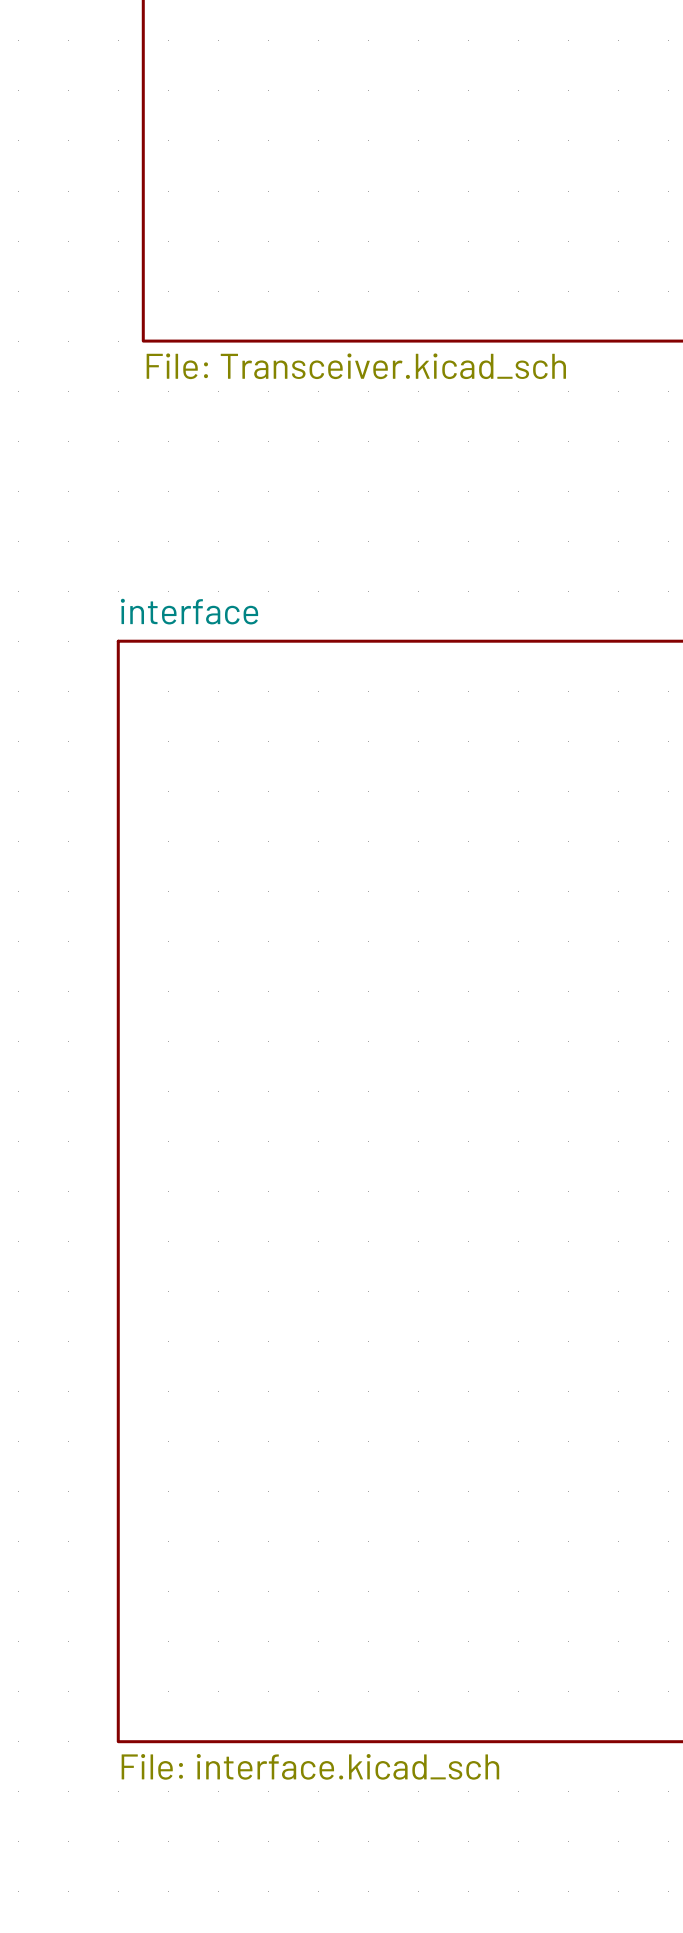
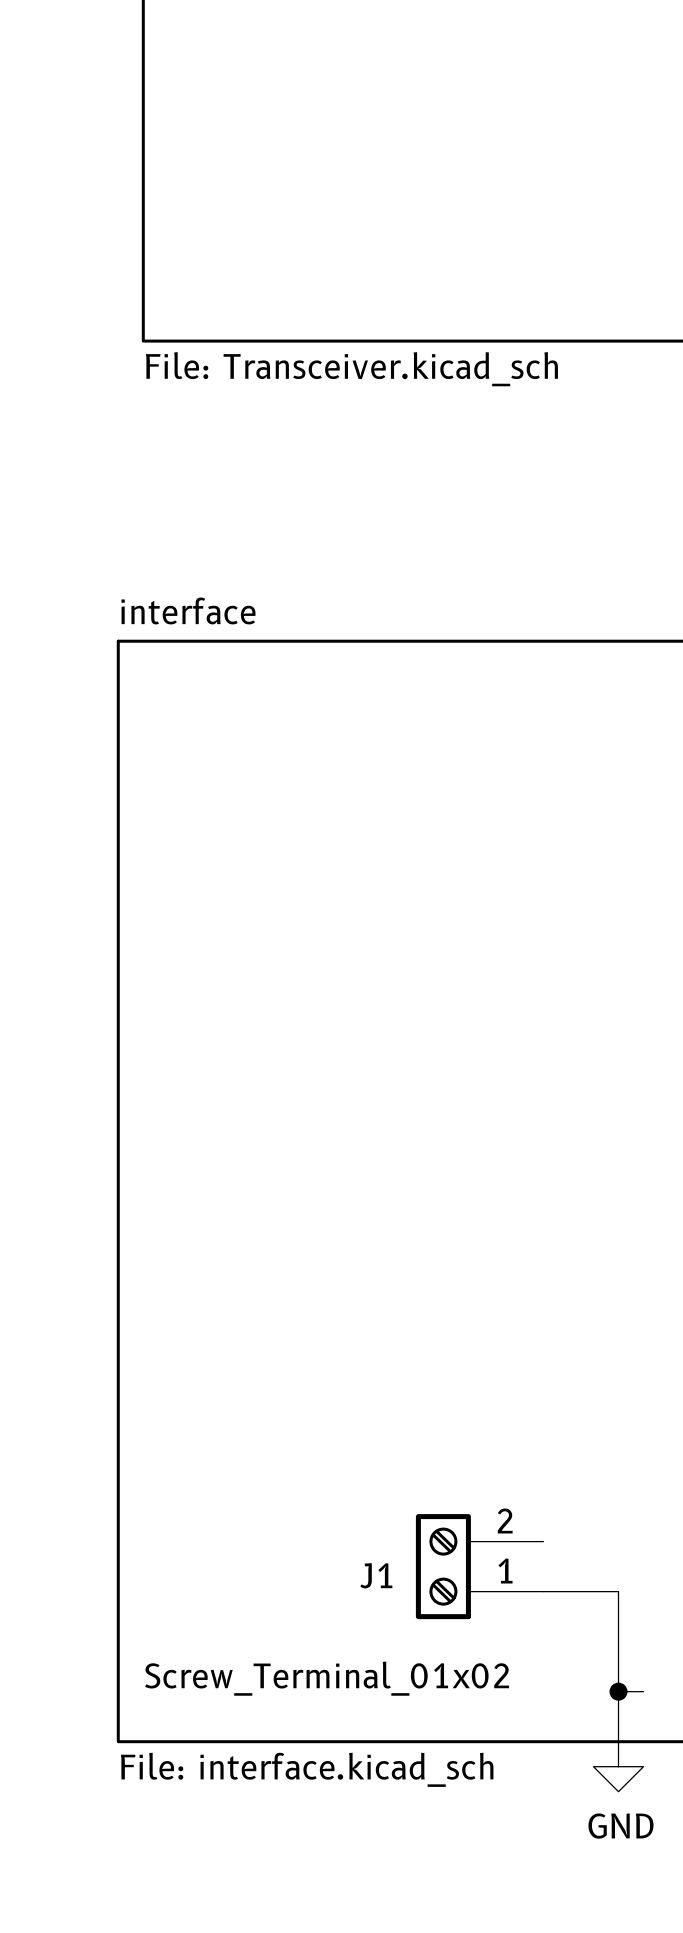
J1: none -> Screw_Terminal_01x02 (479, 1566)
wire: none -> (543, 1591) (618, 1591) (618, 1741)
wire: none -> (618, 1691) (643, 1691)
junction: none -> (618, 1691)
power symbol: none -> GND (618, 1766)

